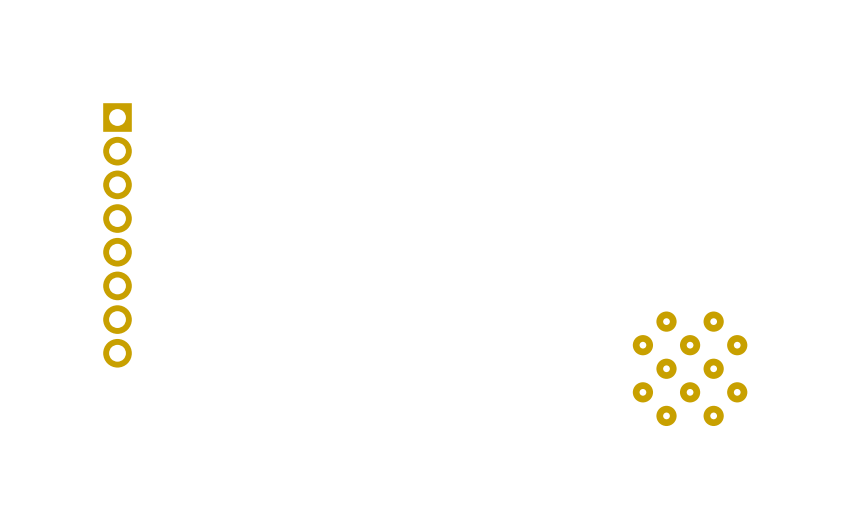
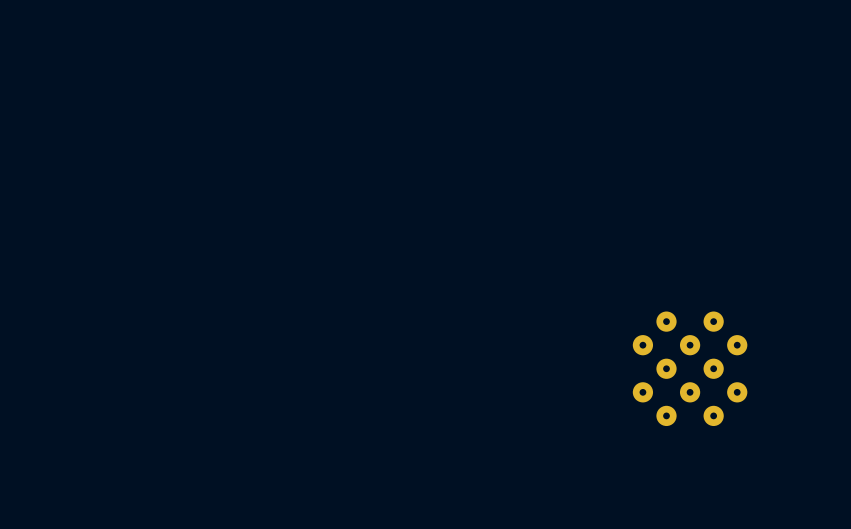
part: (117, 235) -> none

